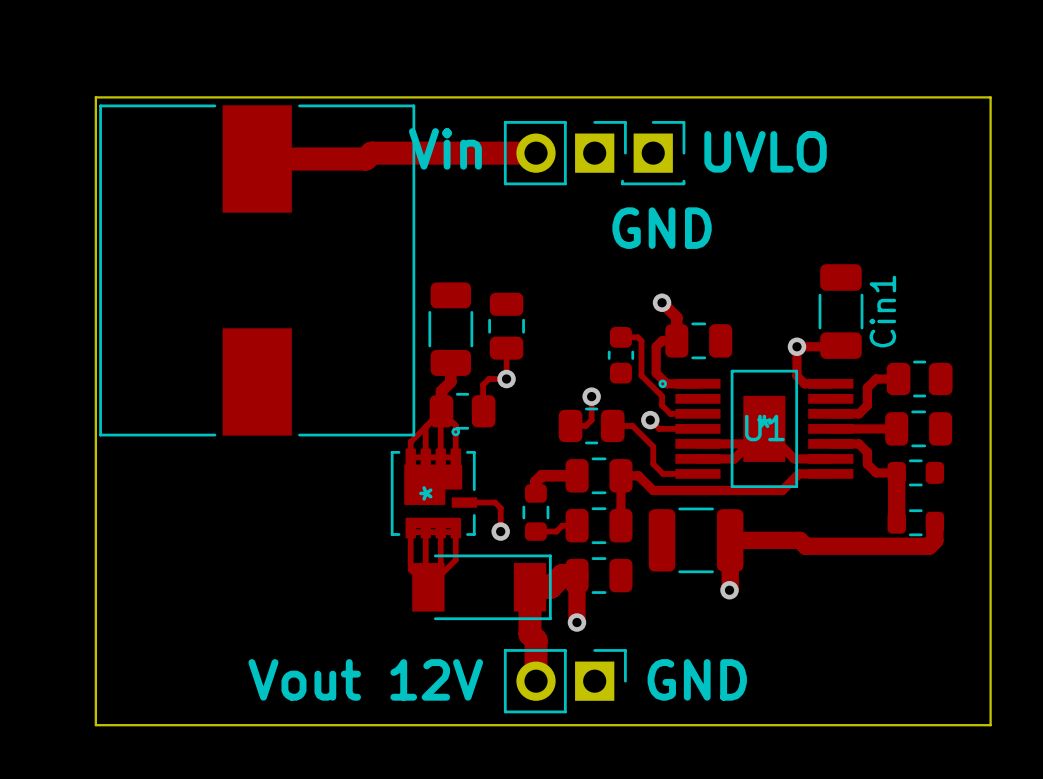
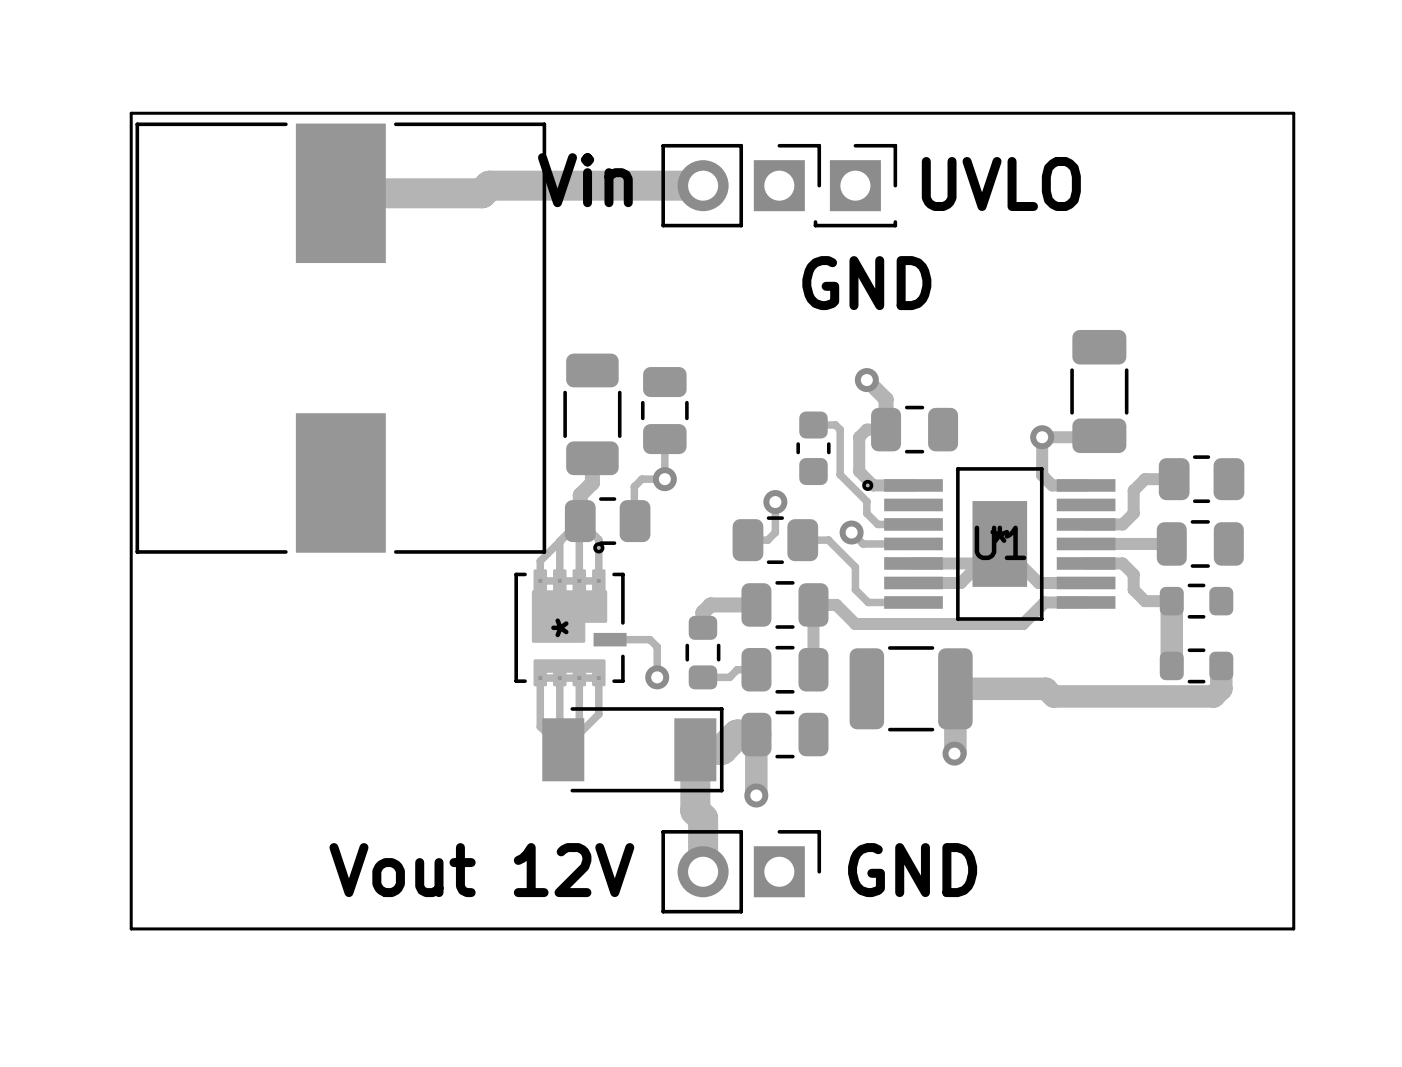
Cin1 name: Cin1 (882, 311) -> none

